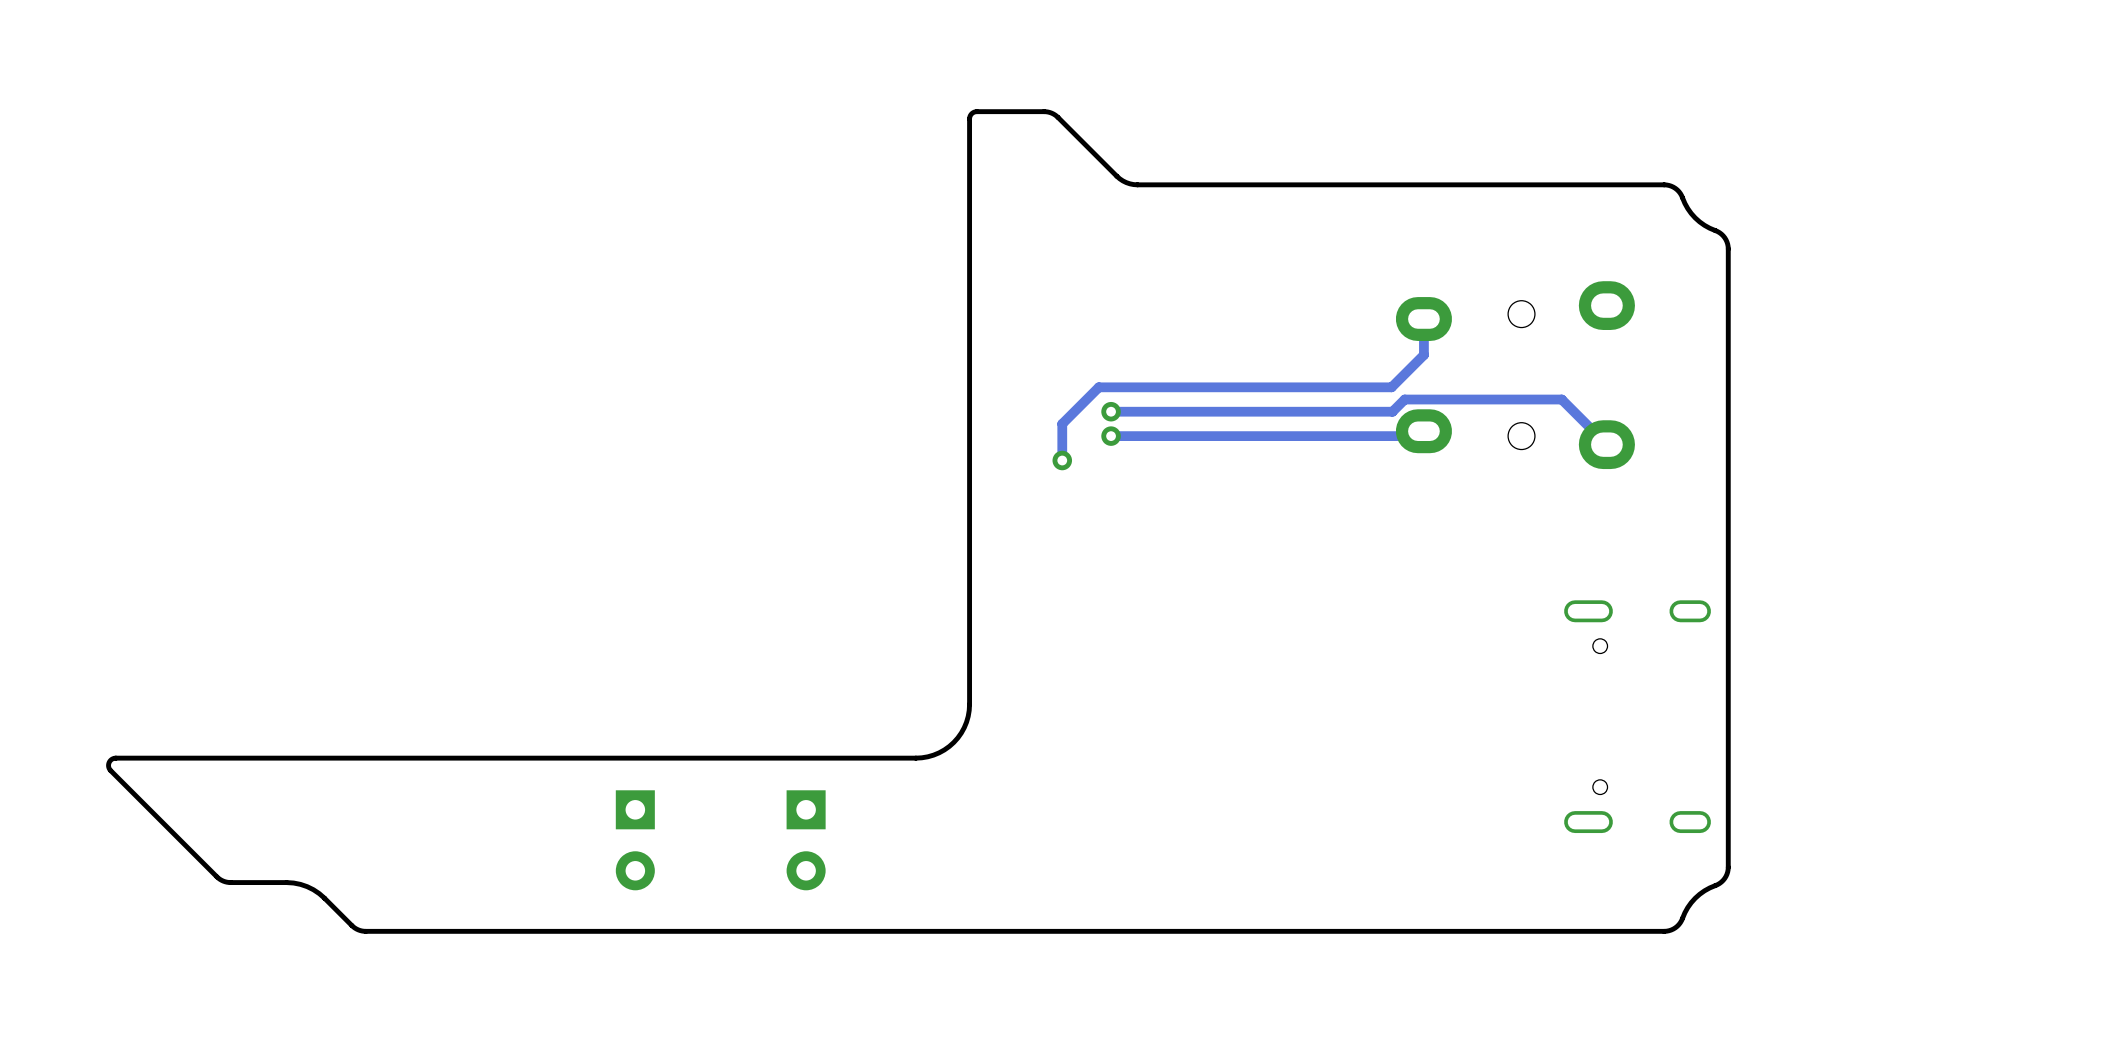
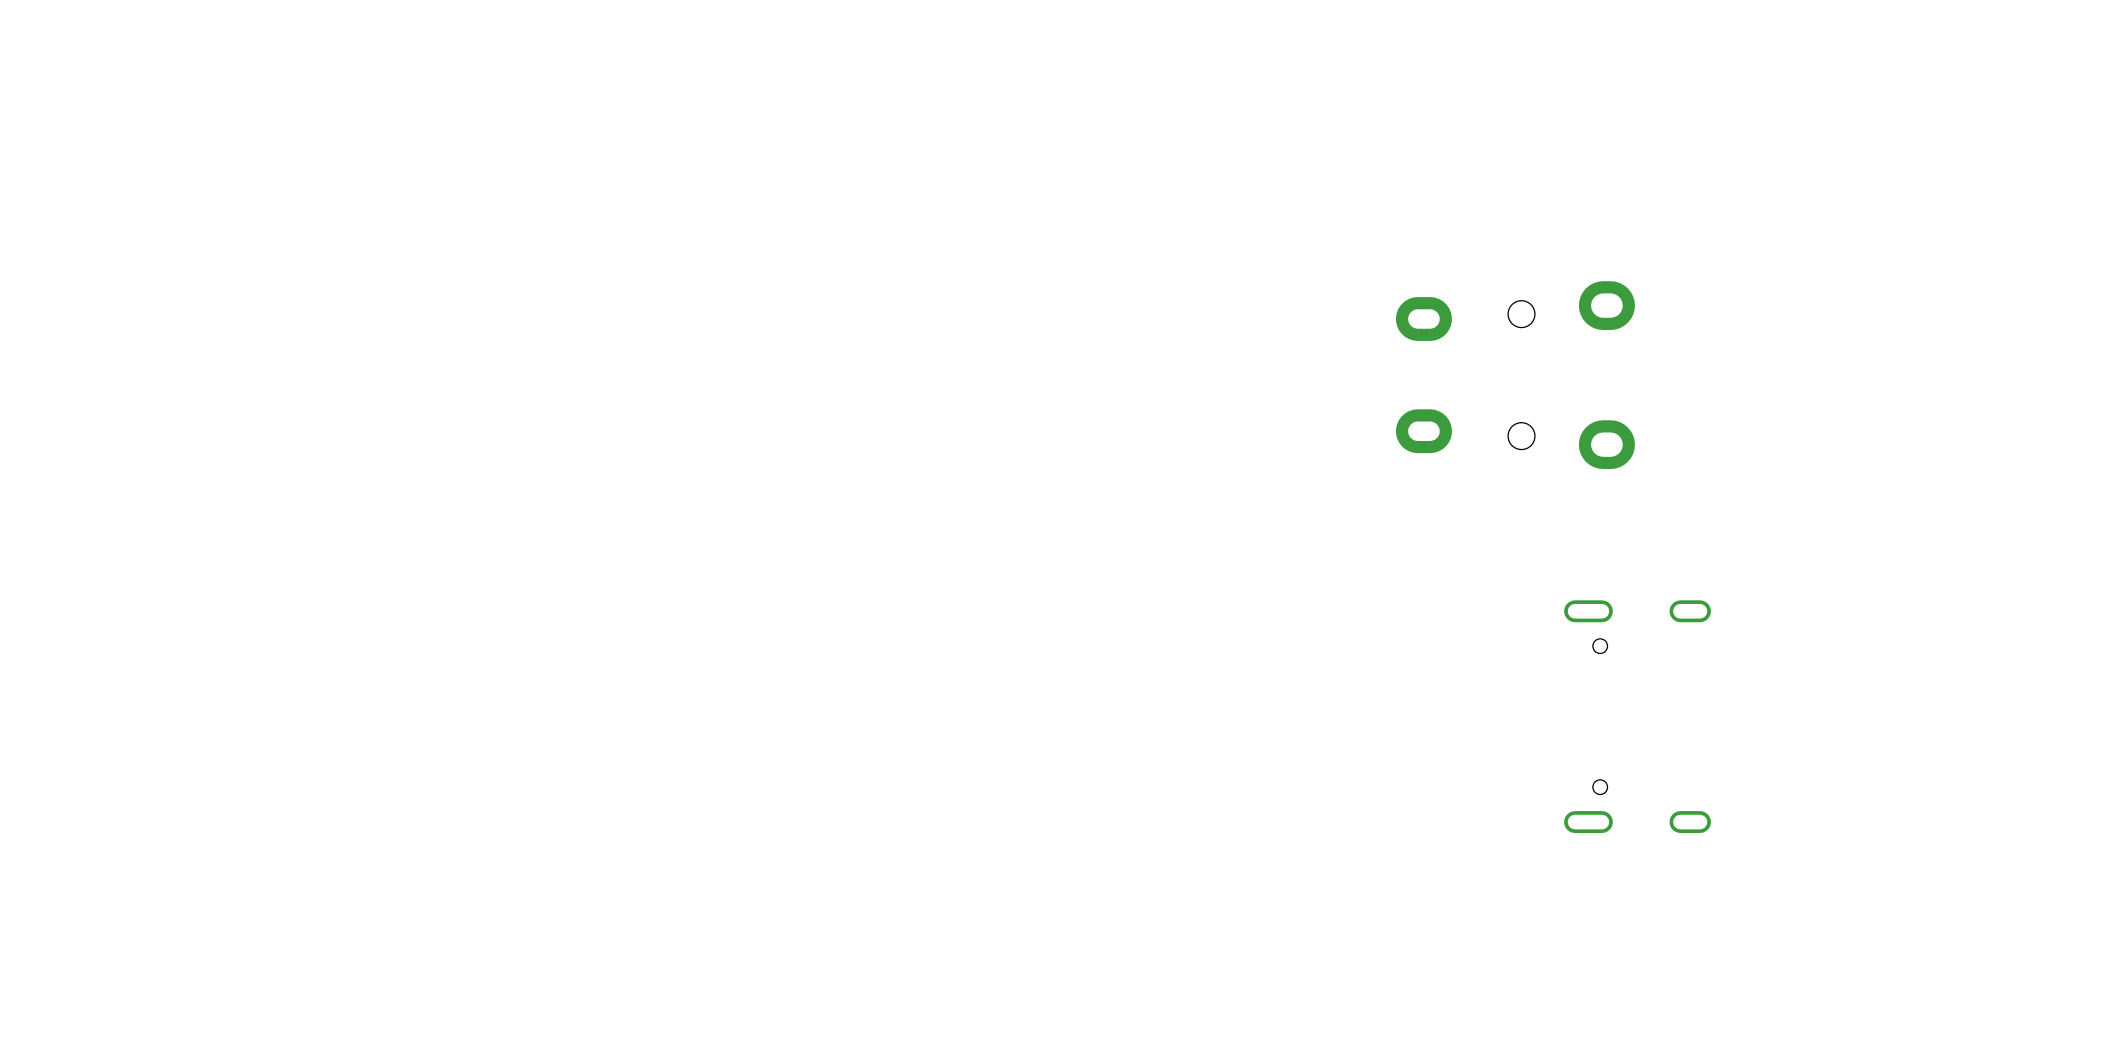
board edge: (1044, 111) (975, 111) (971, 113) (969, 118) (969, 704) (966, 722) (961, 733) (944, 749) (933, 755) (915, 758) (115, 758) (109, 762) (110, 769) (219, 879) (228, 882) (293, 883) (307, 886) (319, 893) (353, 926) (363, 931) (1664, 931) (1675, 927) (1695, 898) (1721, 882) (1728, 869) (1728, 248) (1724, 237) (1695, 217) (1678, 191) (1666, 184) (1133, 184) (1116, 176) (1056, 116) (1044, 111) -> none
track: (1423, 319) (1423, 354) (1391, 387) (1098, 387) (1062, 423) (1062, 460) -> none
track: (1111, 411) (1392, 411) (1404, 399) (1561, 399) (1606, 444) -> none
via: (1111, 411) -> none
track: (1423, 431) (1419, 436) (1111, 436) -> none
via: (1111, 436) -> none
via: (1062, 460) -> none
part: (635, 840) -> none
part: (806, 840) -> none

